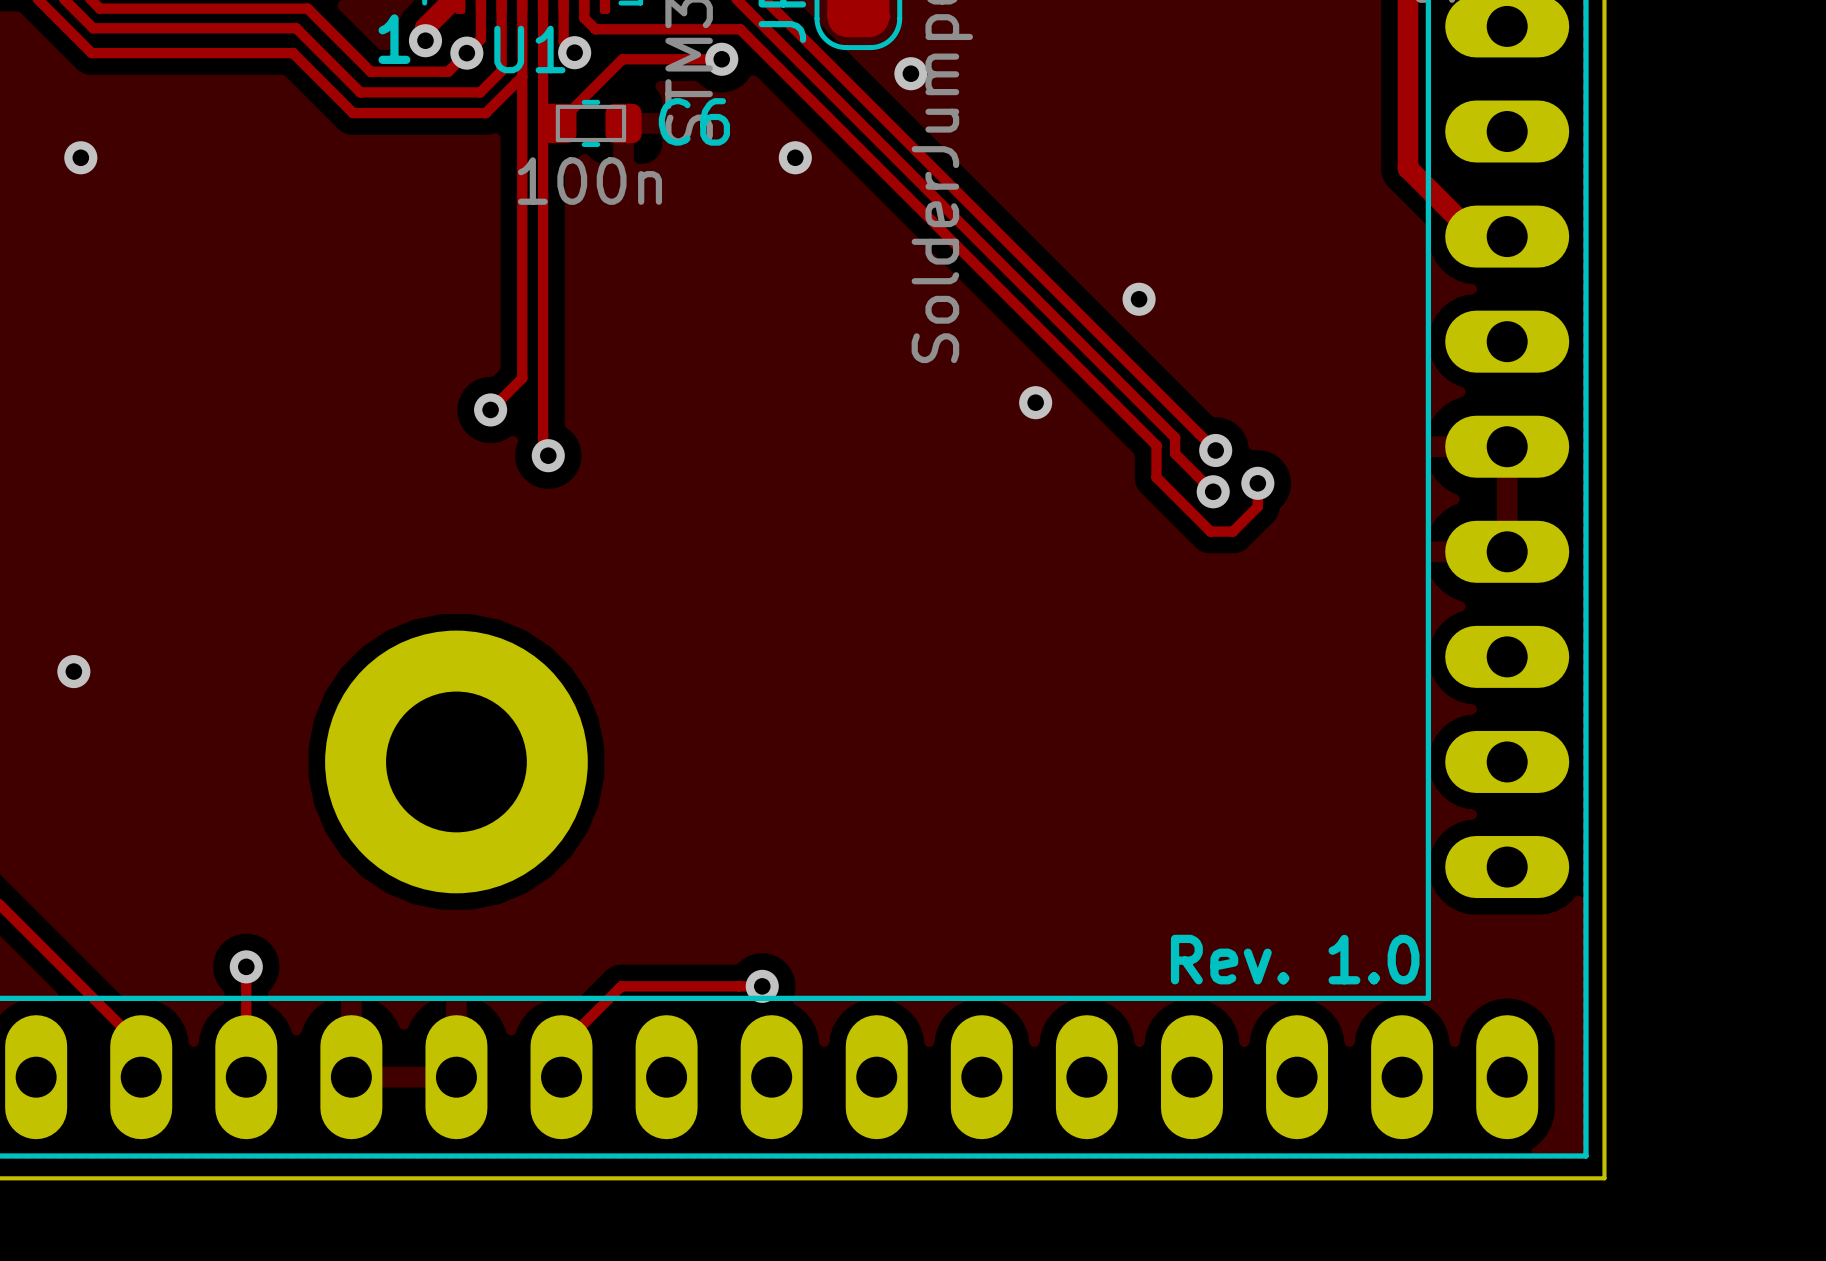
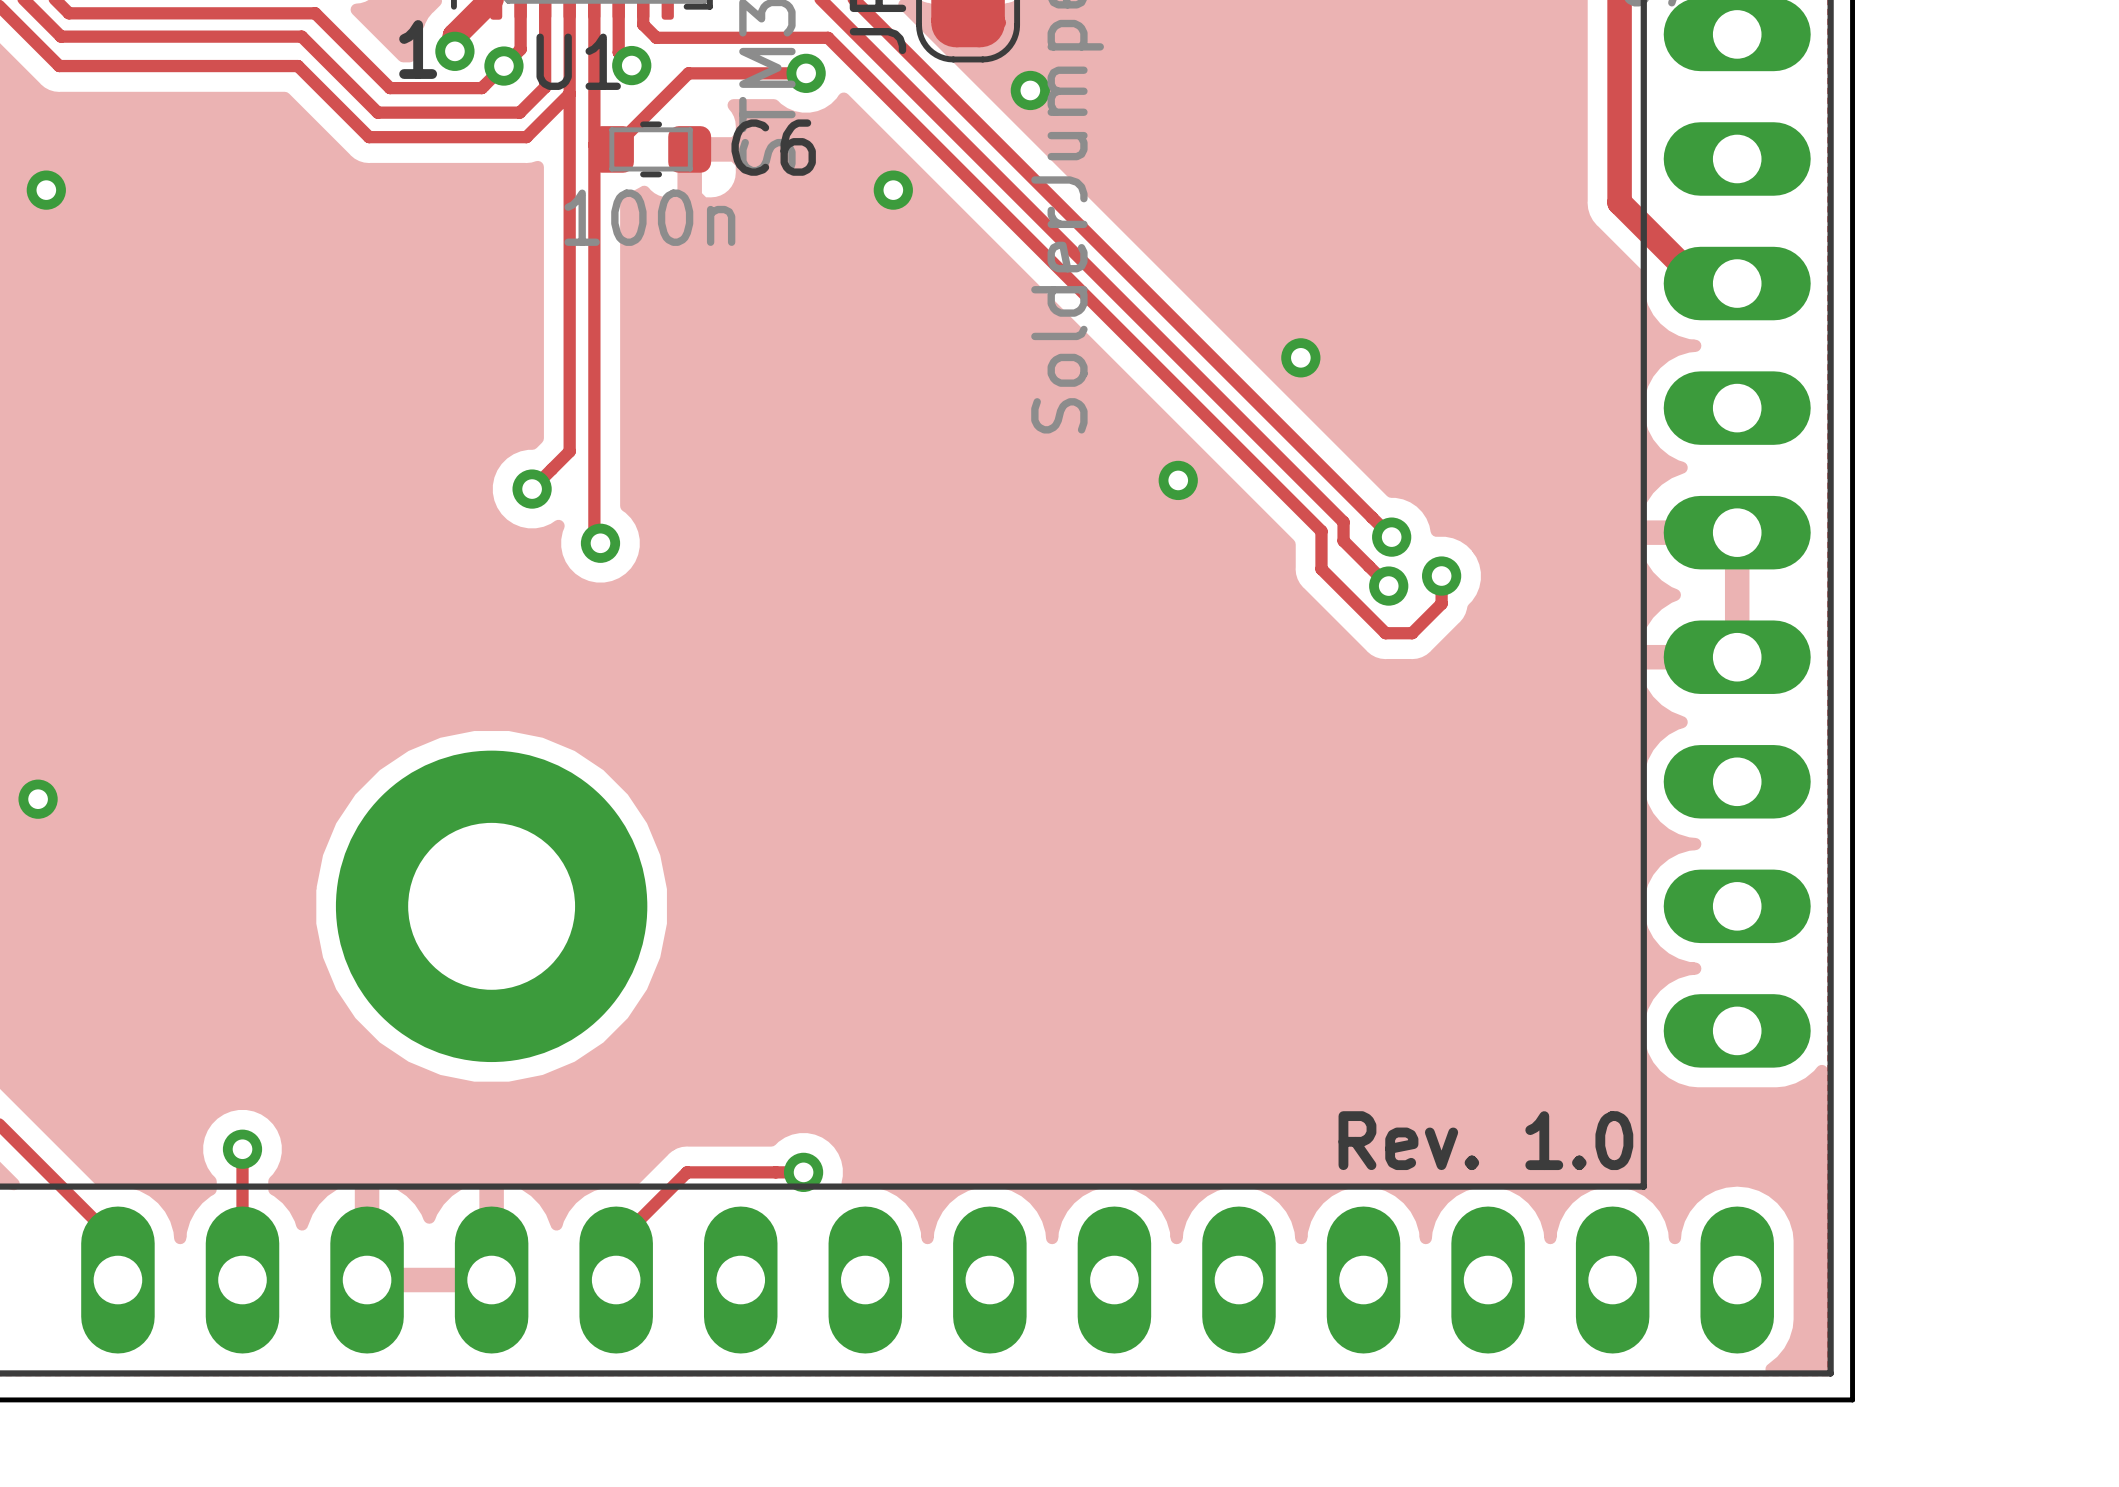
track: (719, 986) (762, 986) -> none
via position: (762, 986) -> (803, 1172)

